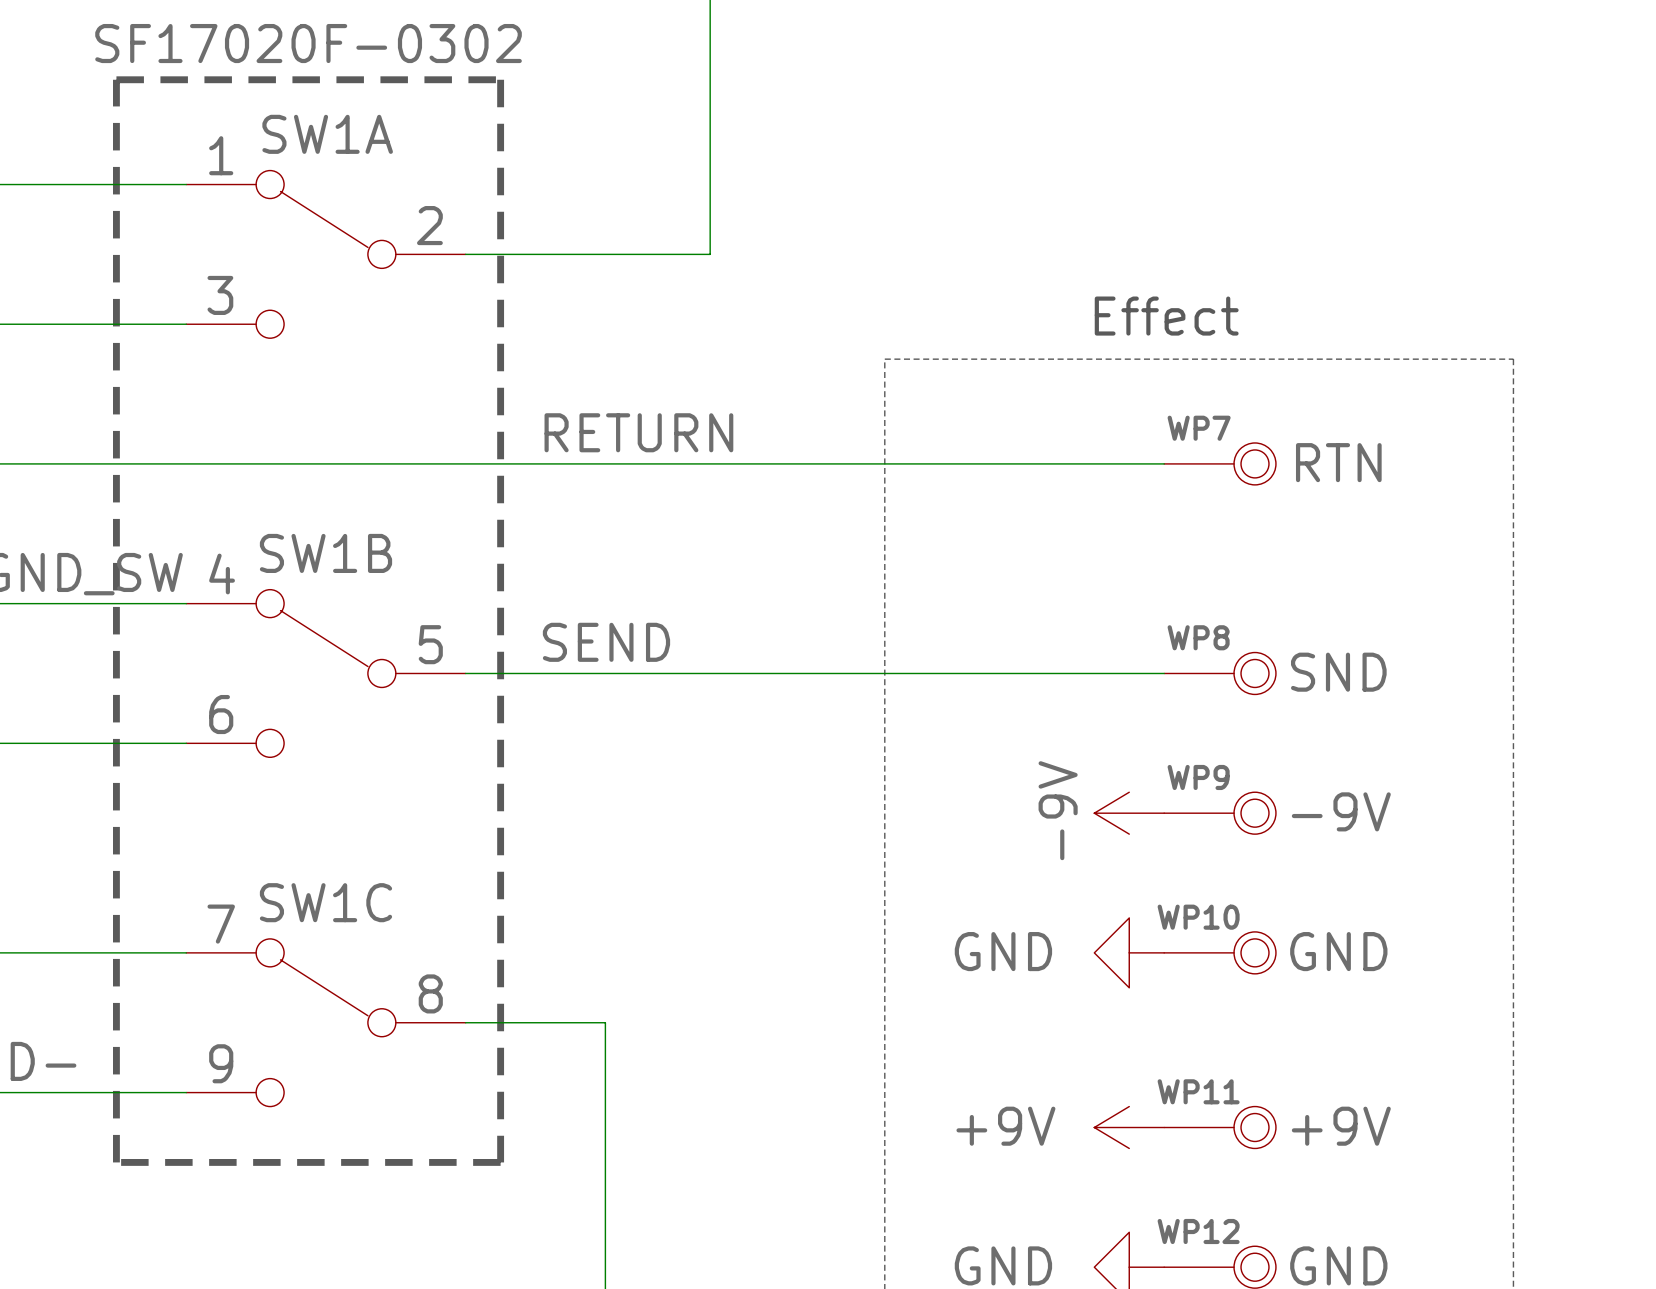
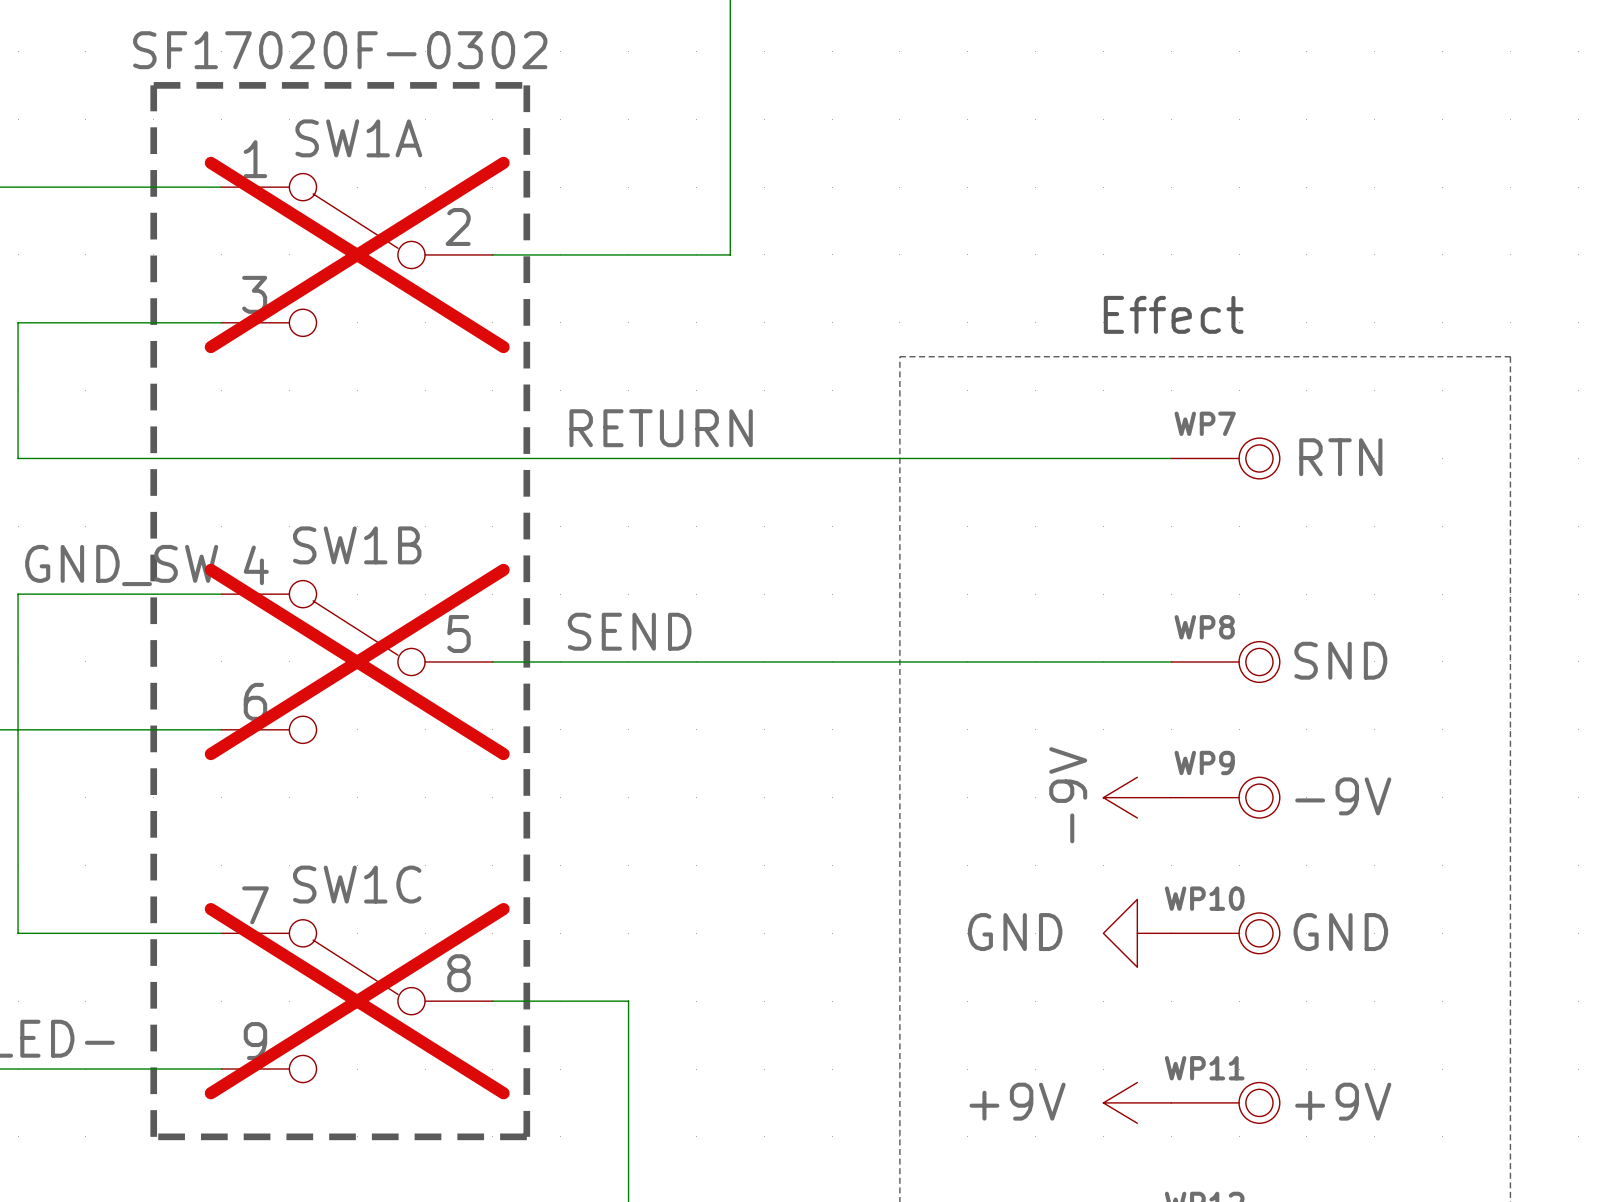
SW1A do-not-place cross: none -> (357, 254)
SW1B do-not-place cross: none -> (357, 661)
SW1C do-not-place cross: none -> (357, 1001)

